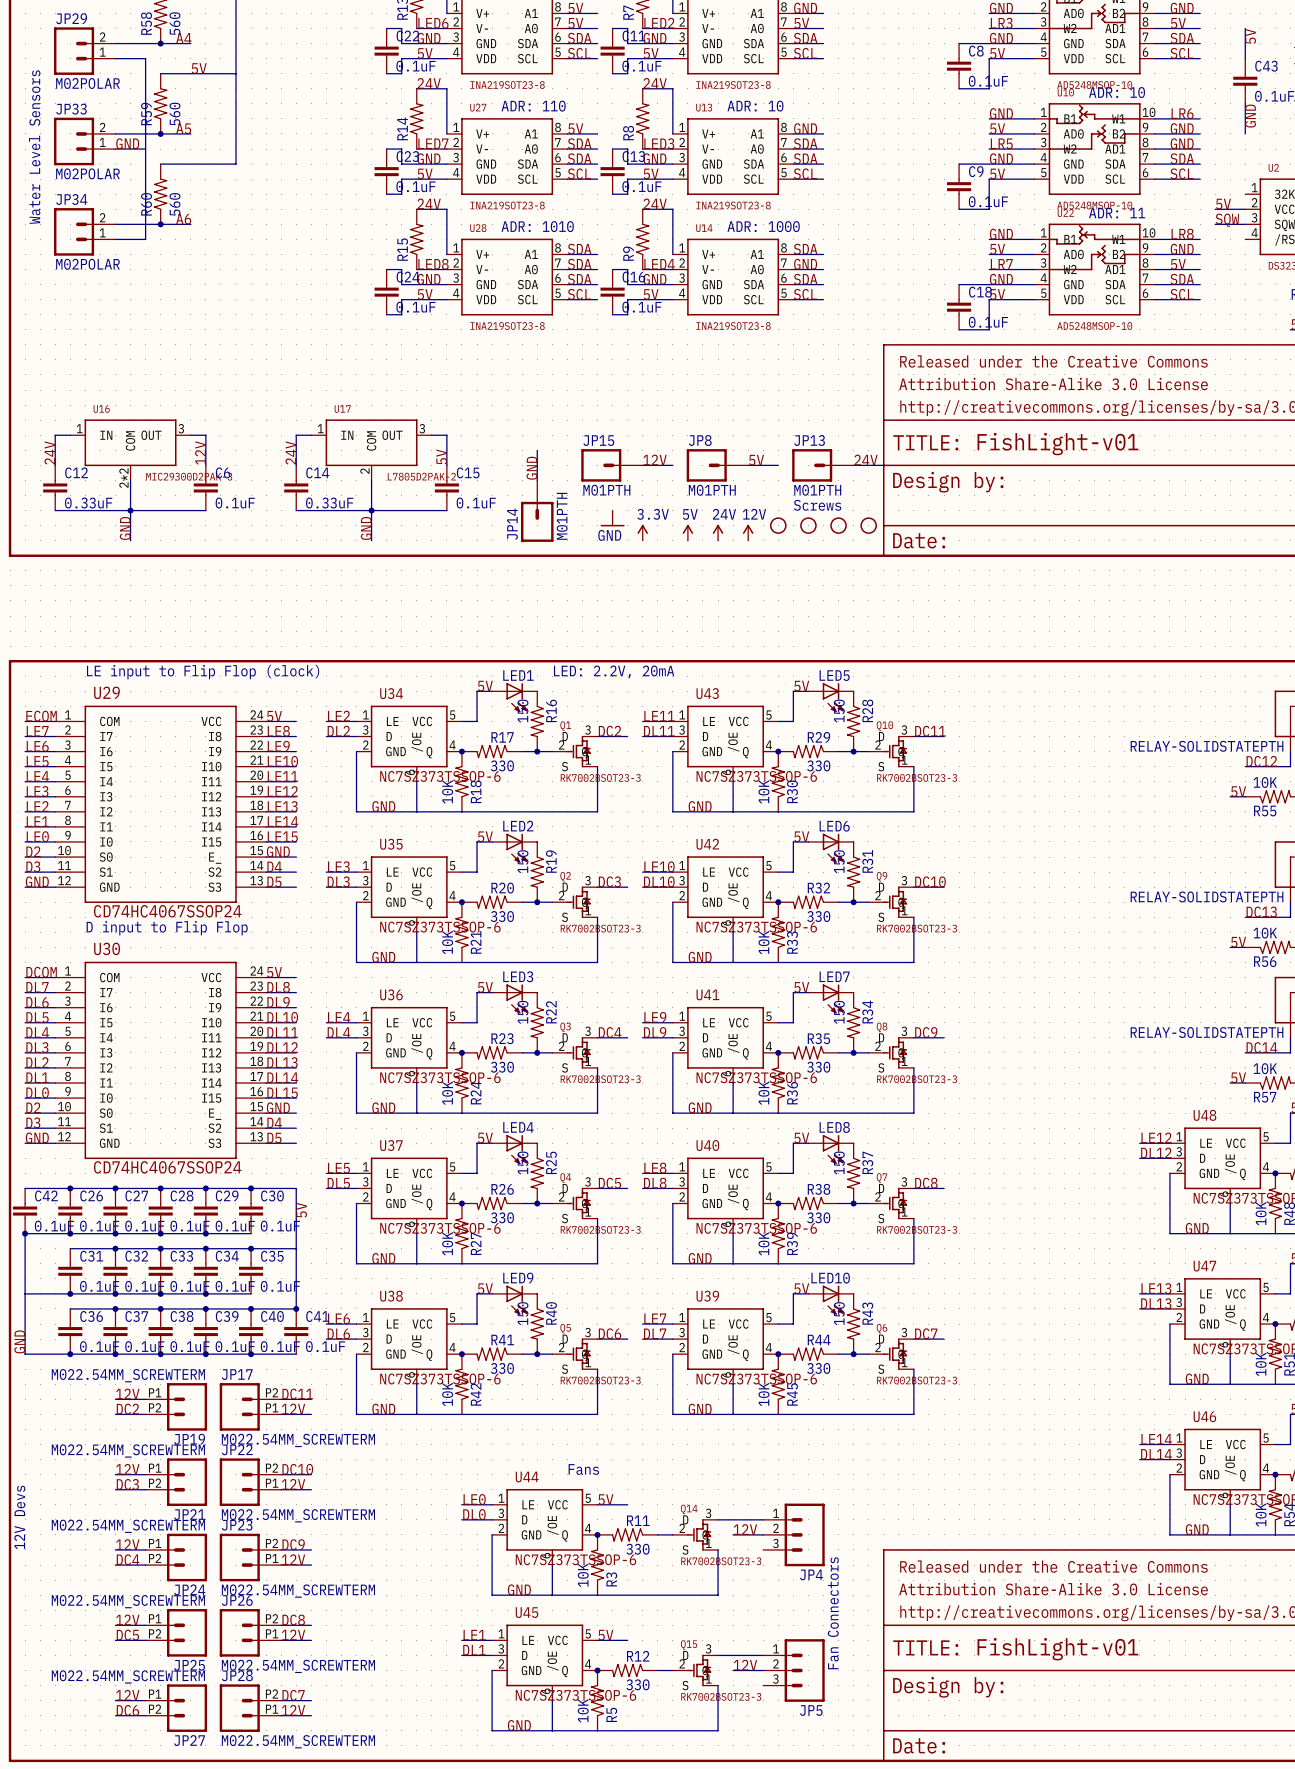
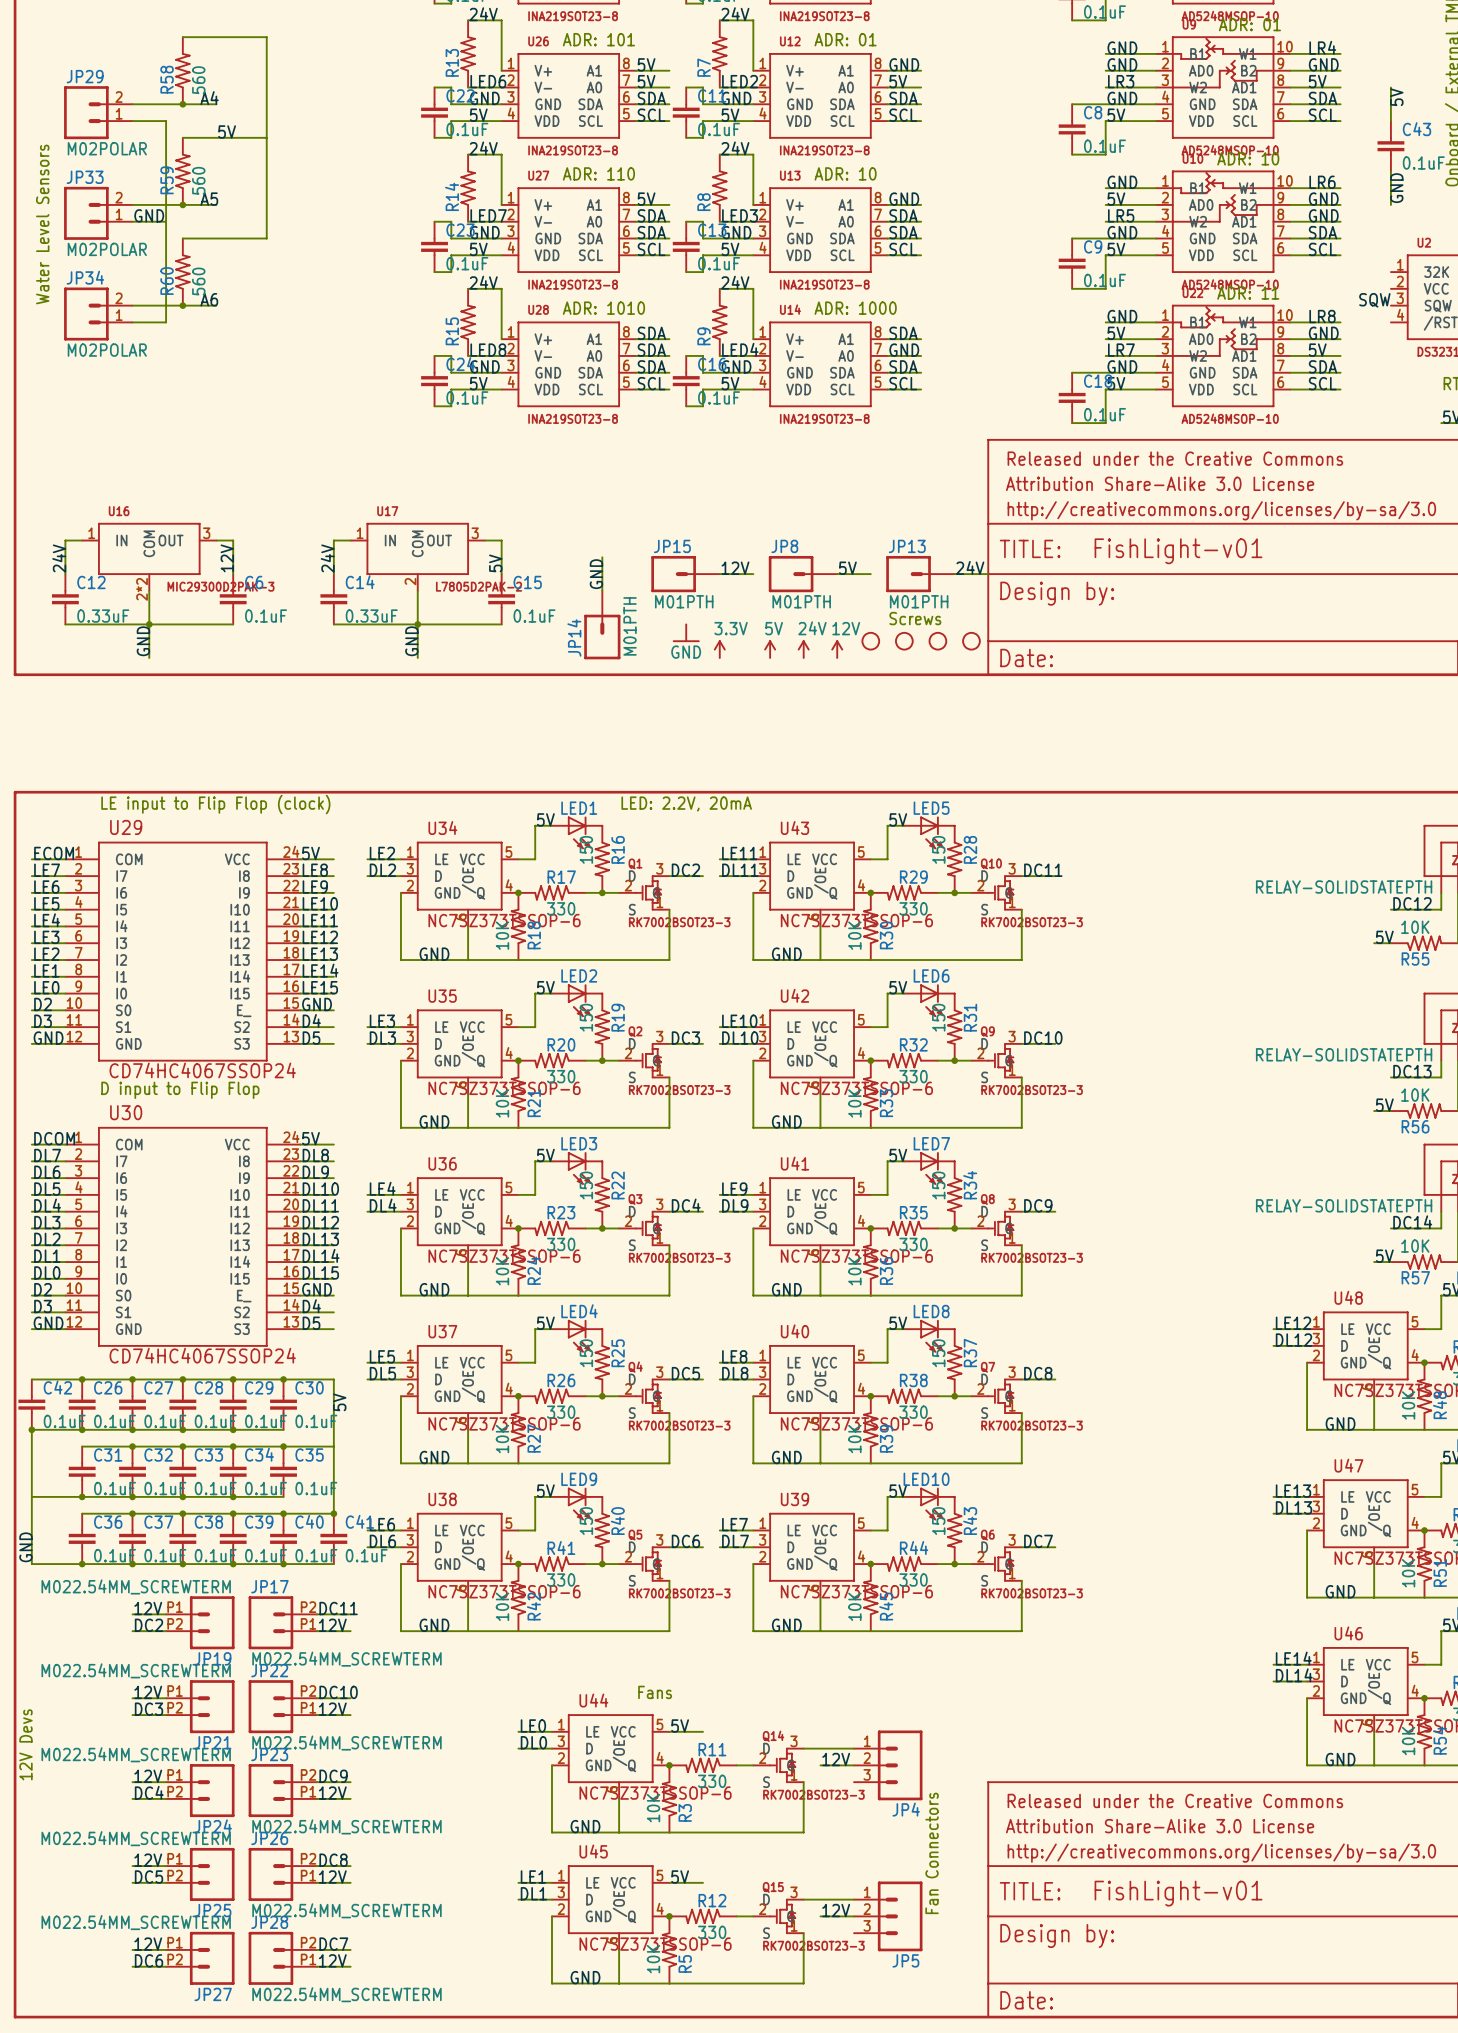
label: 5V (1223, 204) -> none
wire: (1215, 209) (1245, 209) -> none
wire: (1215, 224) (1245, 224) -> none

